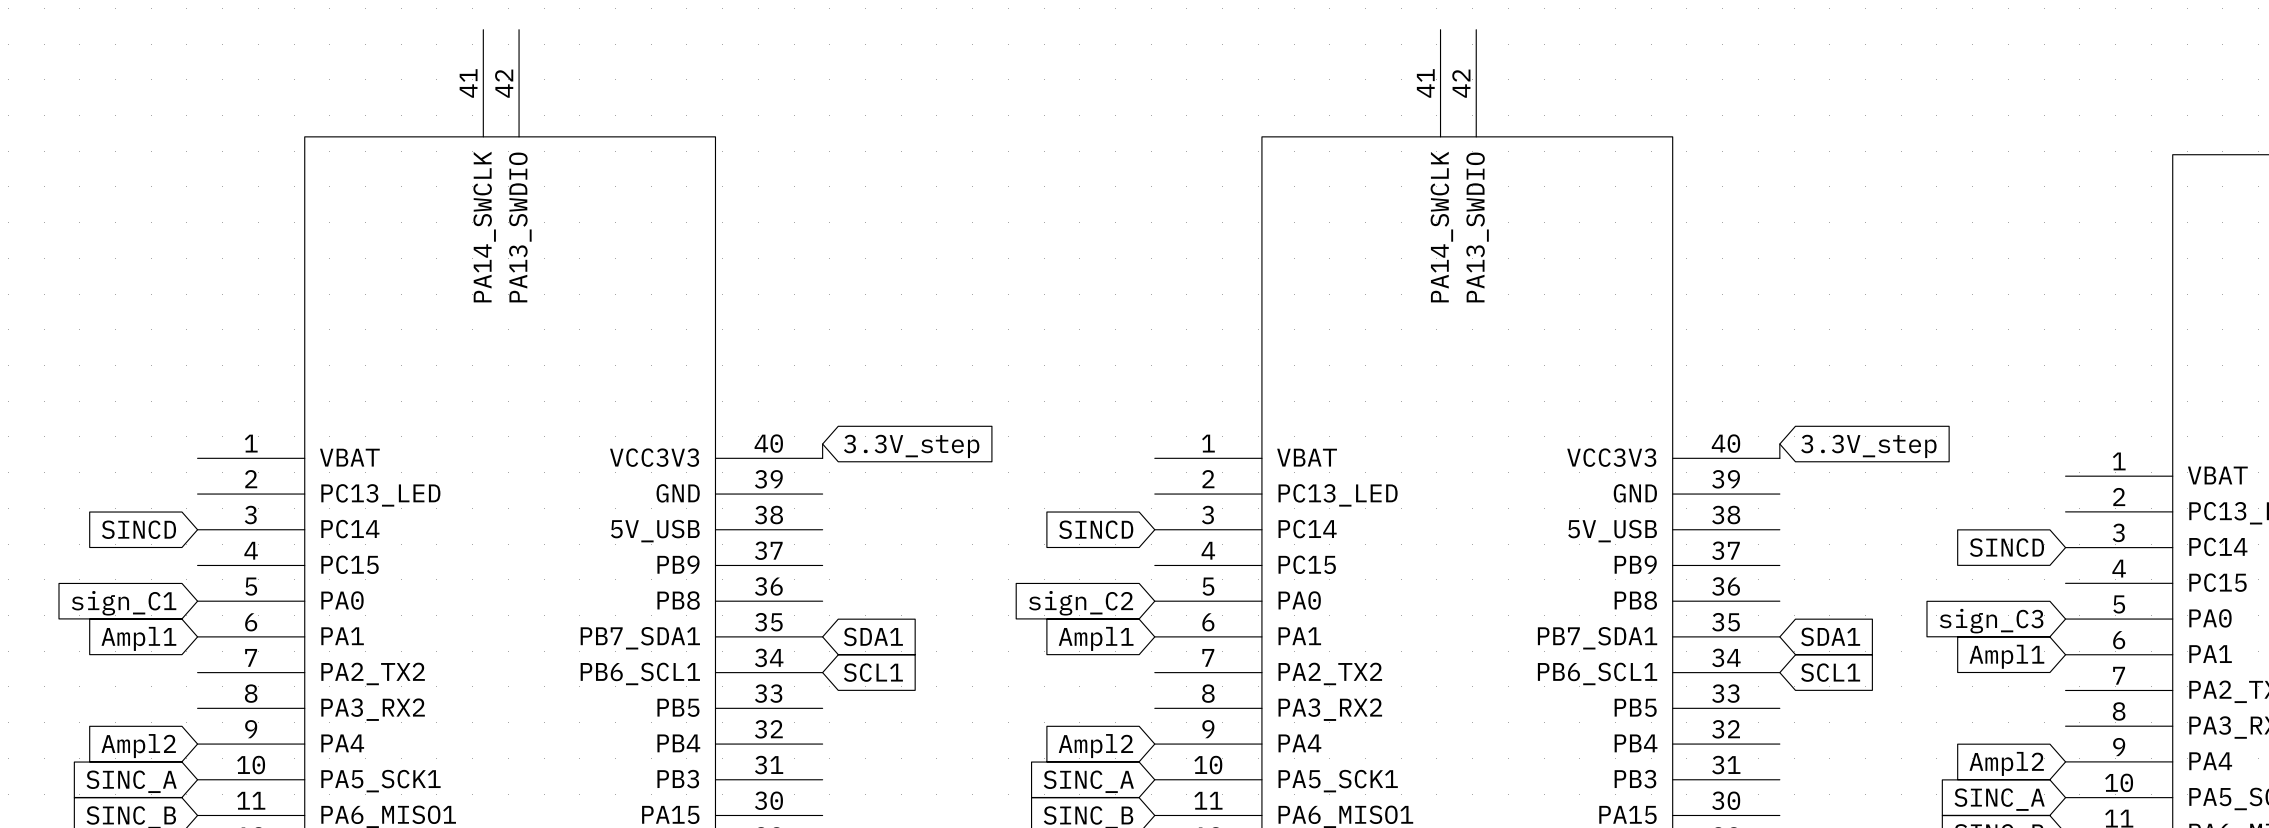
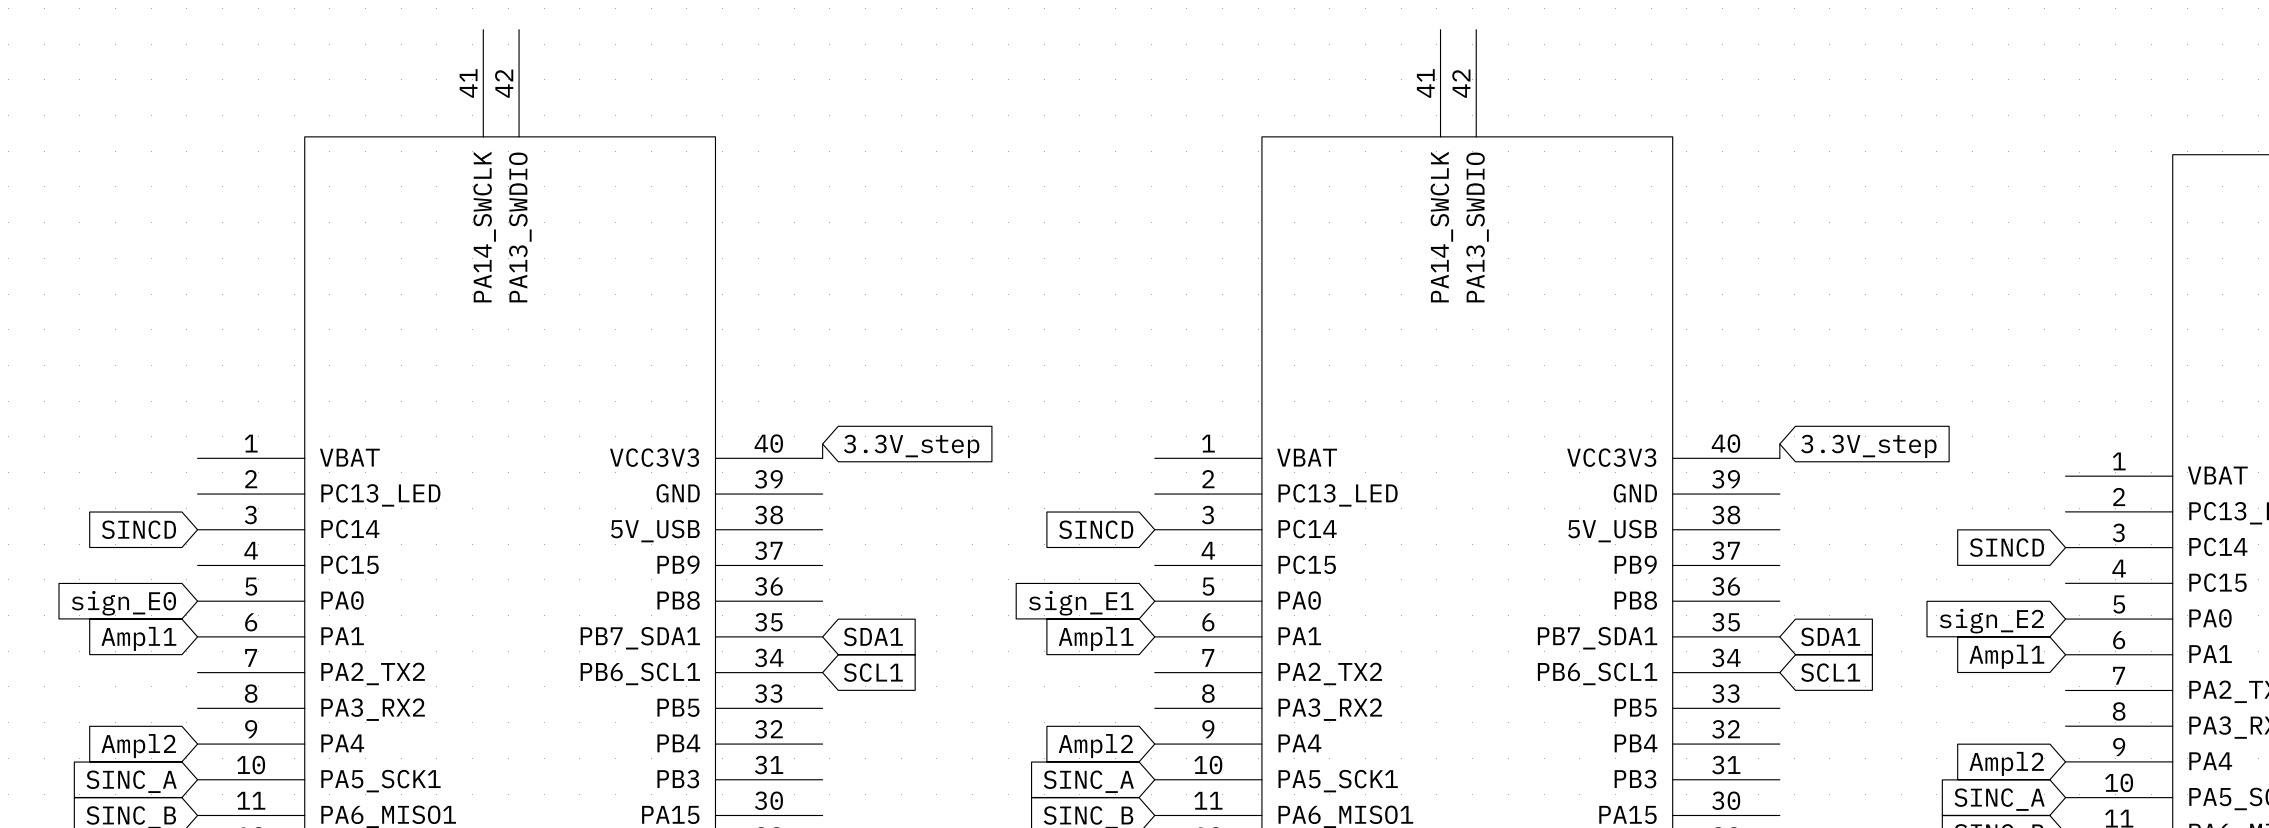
global label: sign_C1 (124, 603) -> sign_E0 (123, 603)
global label: sign_C2 (1081, 603) -> sign_E1 (1081, 603)
global label: sign_C3 (1991, 621) -> sign_E2 (1991, 621)

